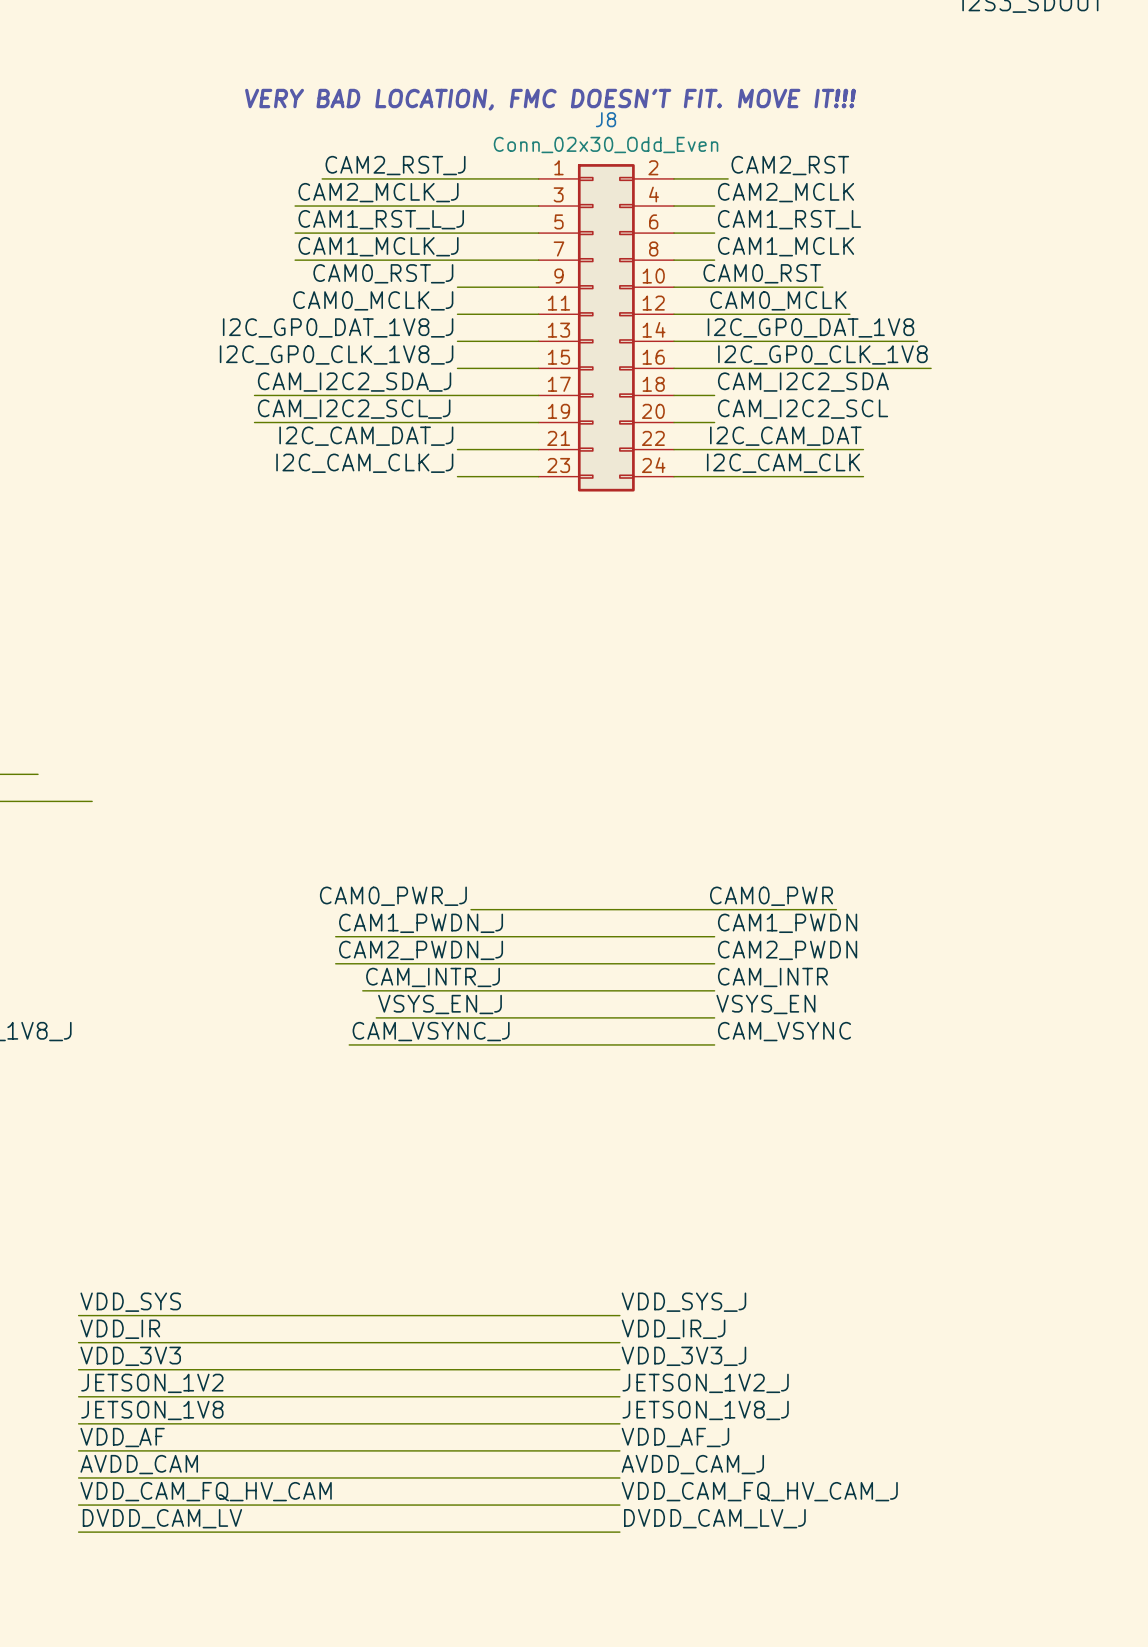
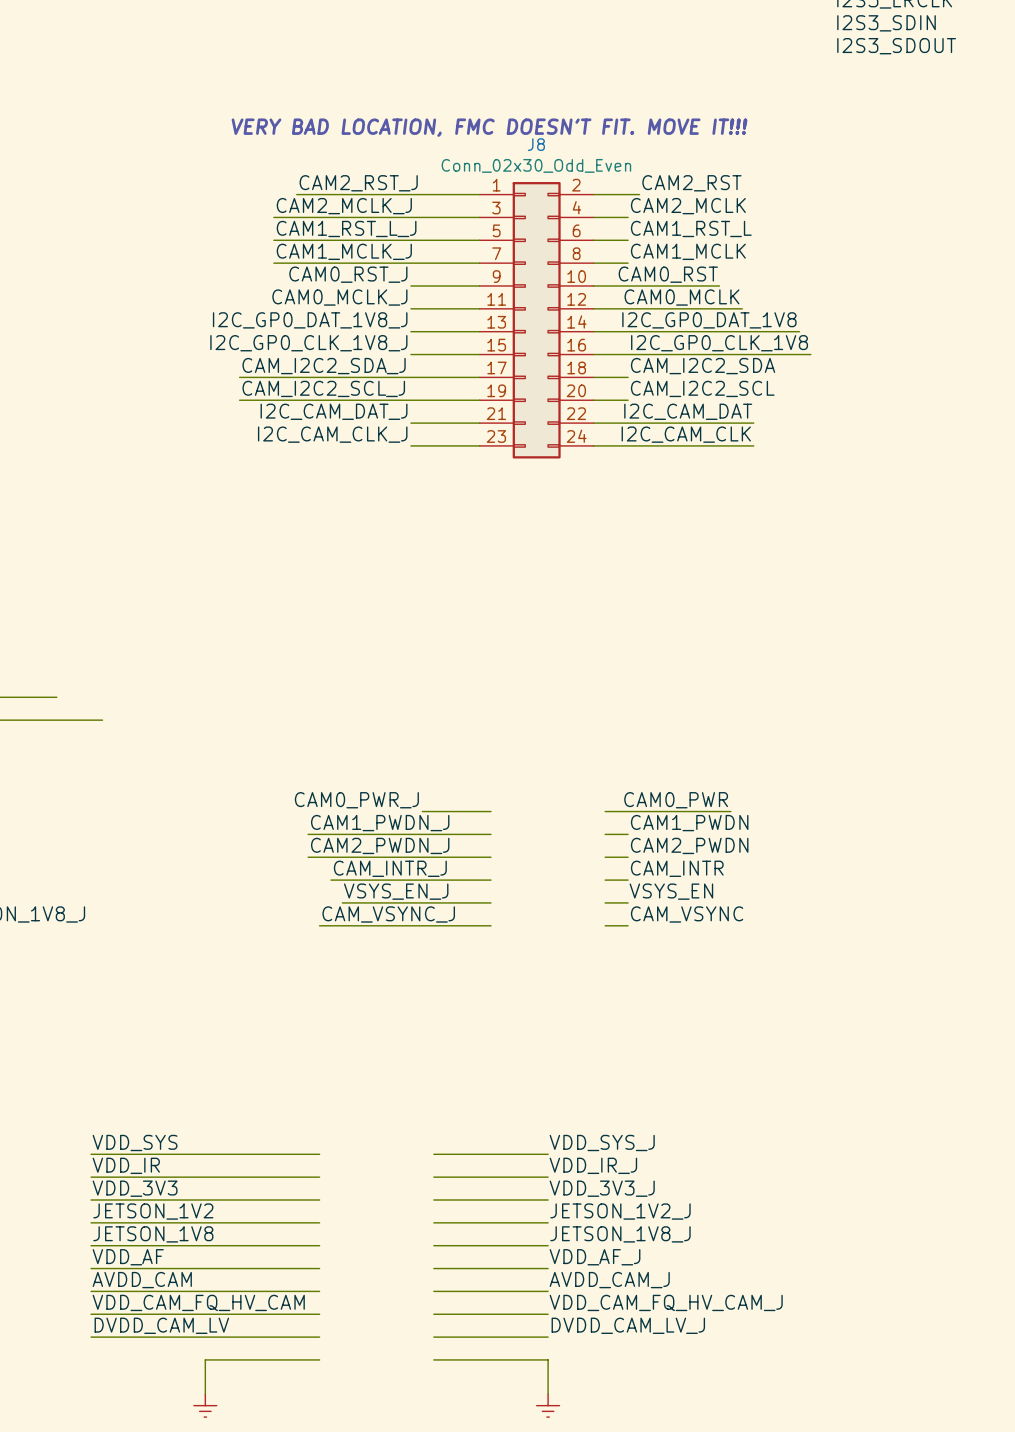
wire: (552, 909) (687, 909) -> none
wire: (552, 936) (687, 936) -> none
wire: (552, 963) (687, 963) -> none
wire: (552, 990) (687, 990) -> none
wire: (552, 1017) (687, 1017) -> none
wire: (552, 1044) (687, 1044) -> none
wire: (349, 1315) (484, 1315) -> none
wire: (349, 1342) (484, 1342) -> none
wire: (349, 1369) (484, 1369) -> none
wire: (349, 1396) (484, 1396) -> none
wire: (349, 1423) (484, 1423) -> none
wire: (349, 1450) (484, 1450) -> none
wire: (349, 1477) (484, 1477) -> none
wire: (349, 1505) (484, 1505) -> none
wire: (349, 1532) (484, 1532) -> none
wire: none -> (319, 1359) (205, 1359) (205, 1394)
wire: none -> (433, 1359) (548, 1359) (548, 1394)
power symbol: none -> (205, 1405)
power symbol: none -> (548, 1405)

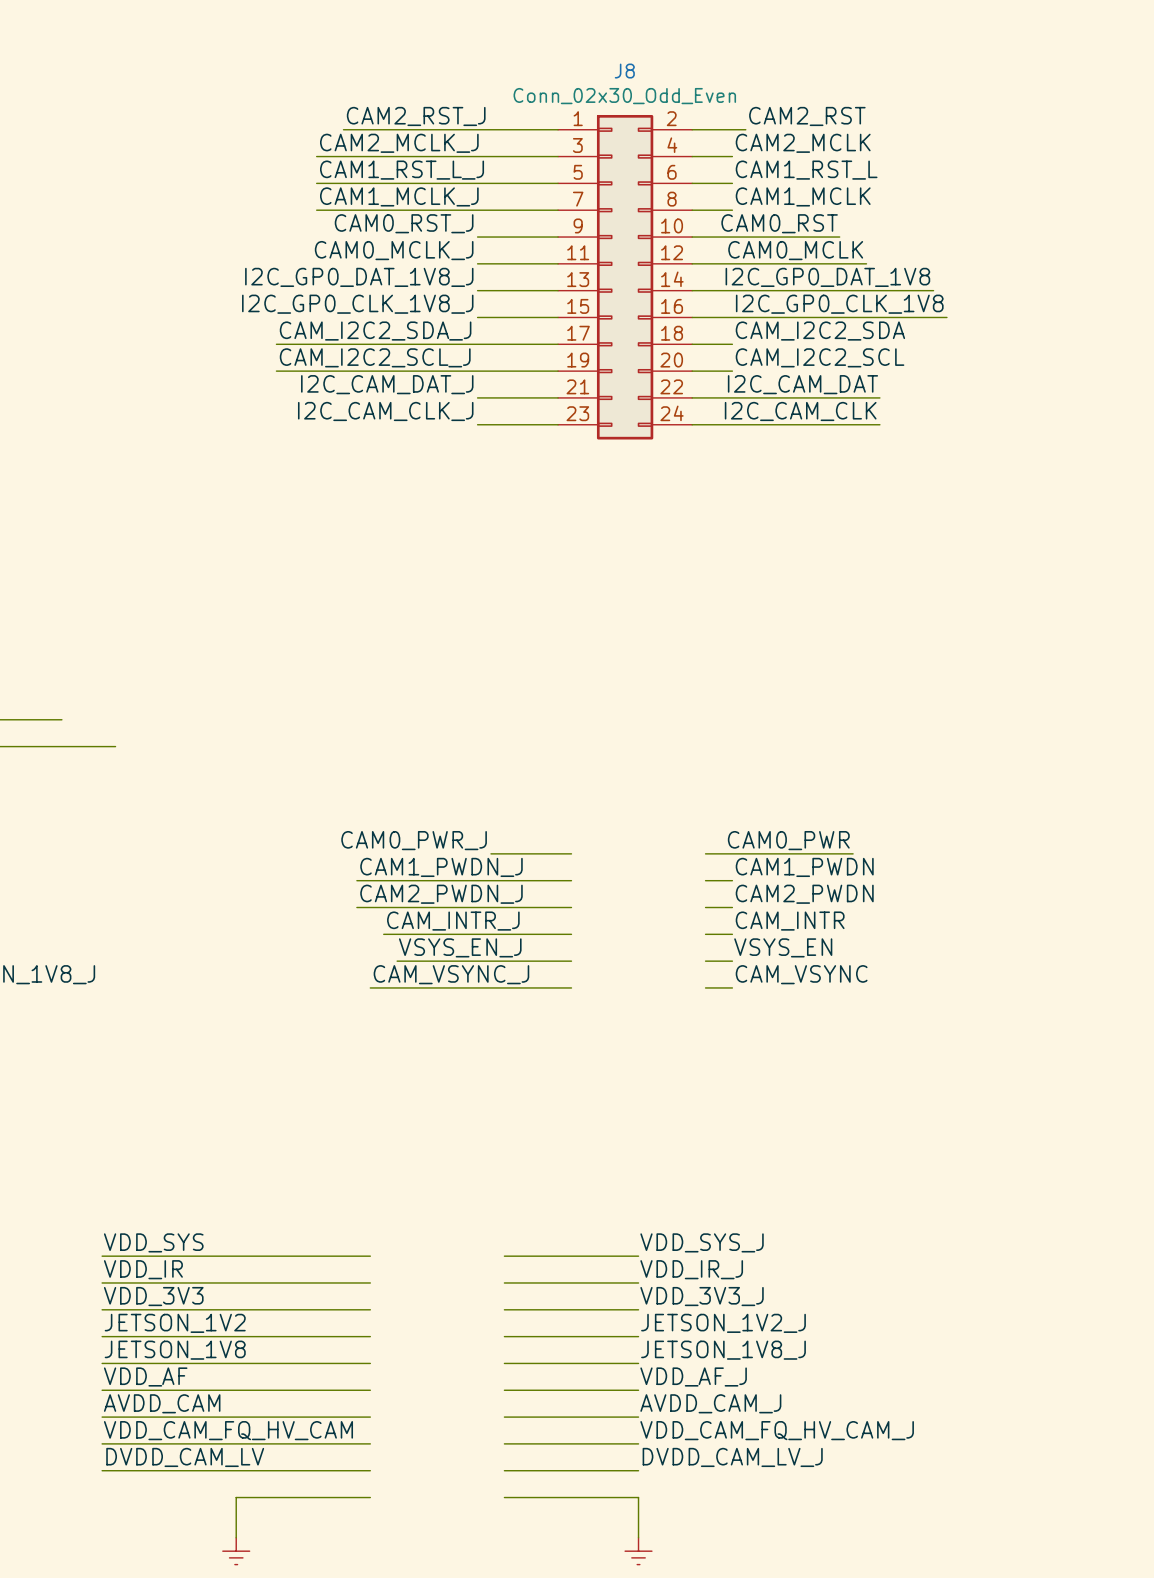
text: VERY BAD LOCATION, FMC DOESN'T FIT. MOVE IT!!! (489, 127) -> none

